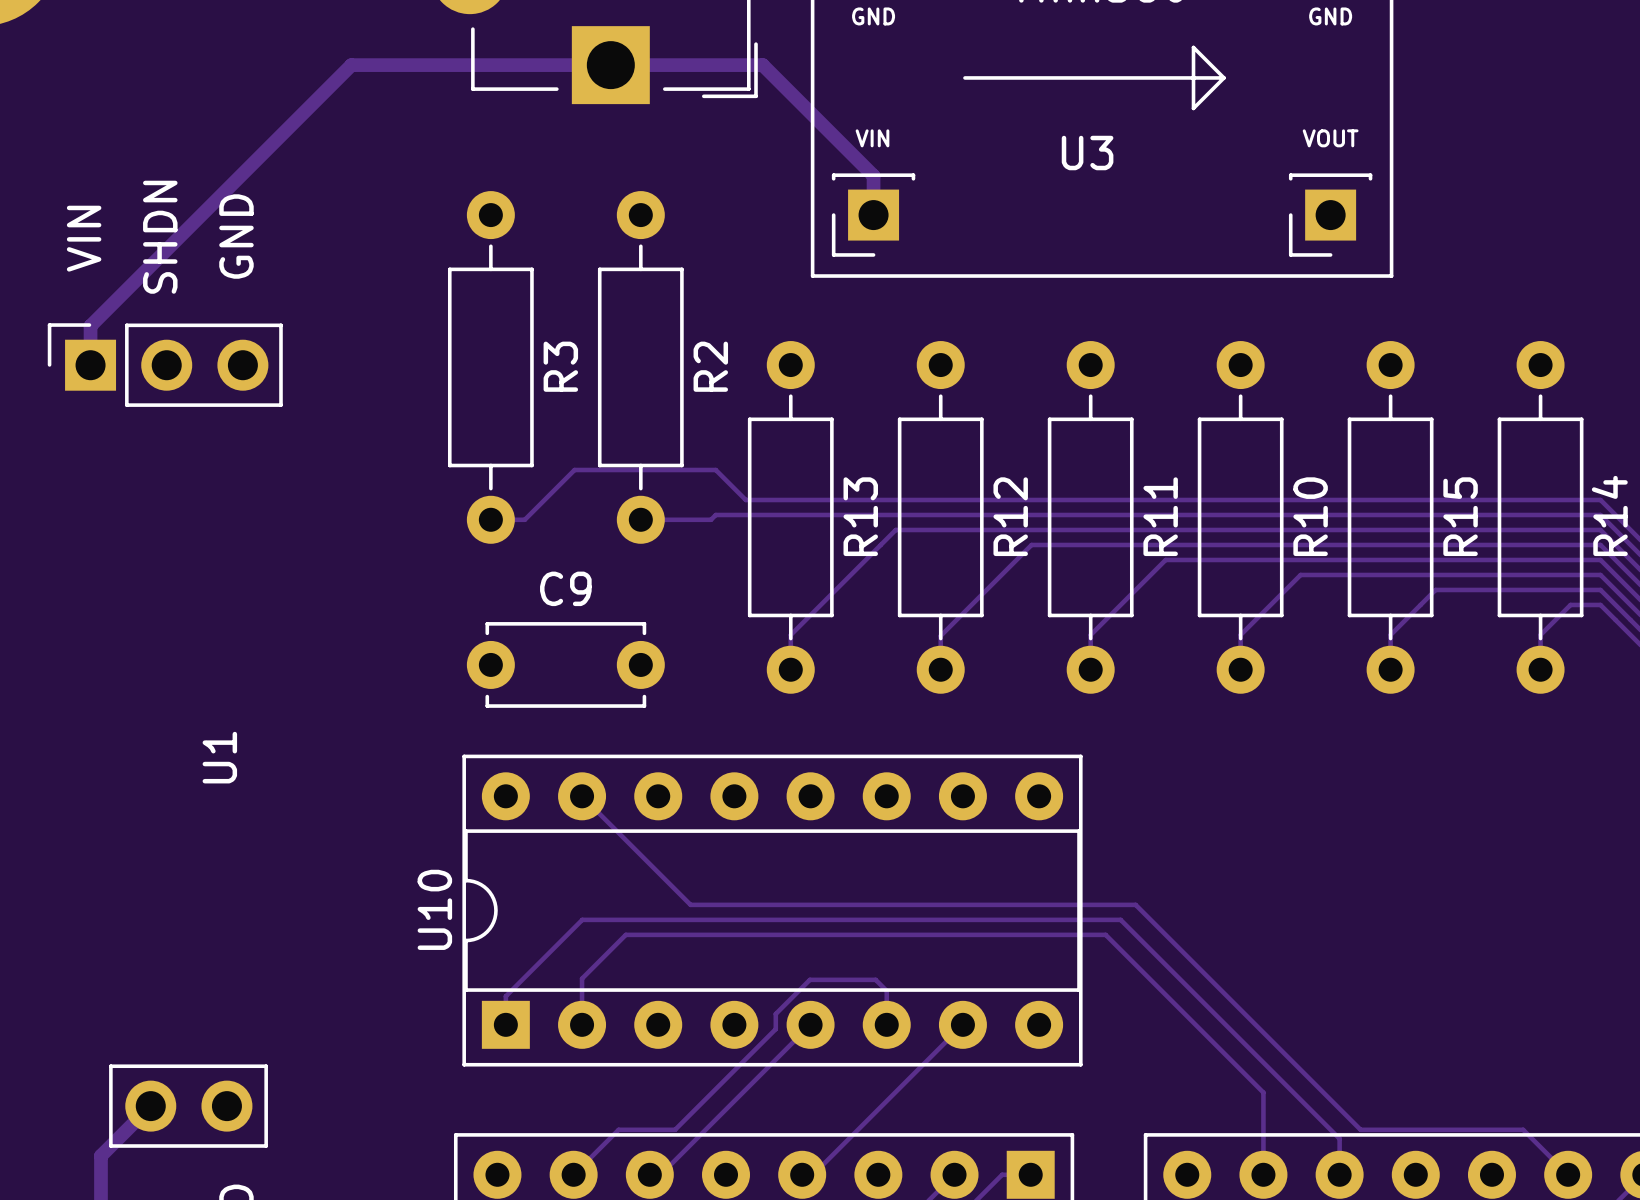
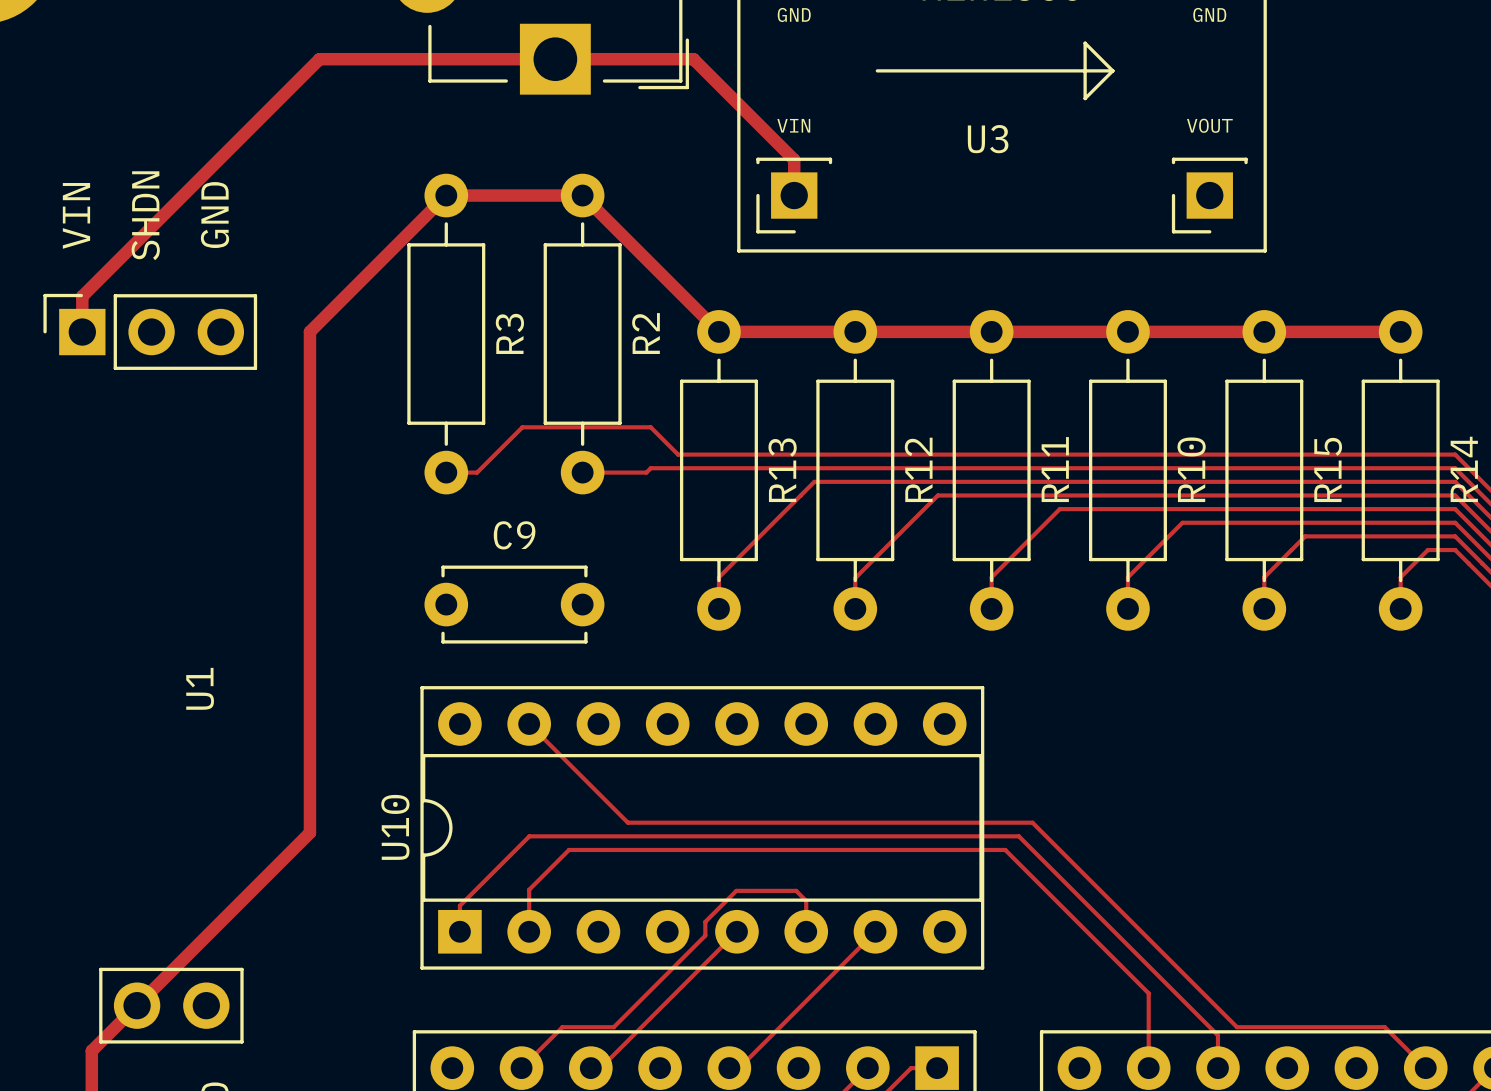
track: none -> (1400, 331) (718, 331) (582, 195) (446, 195) (309, 331) (309, 832) (137, 1005)

